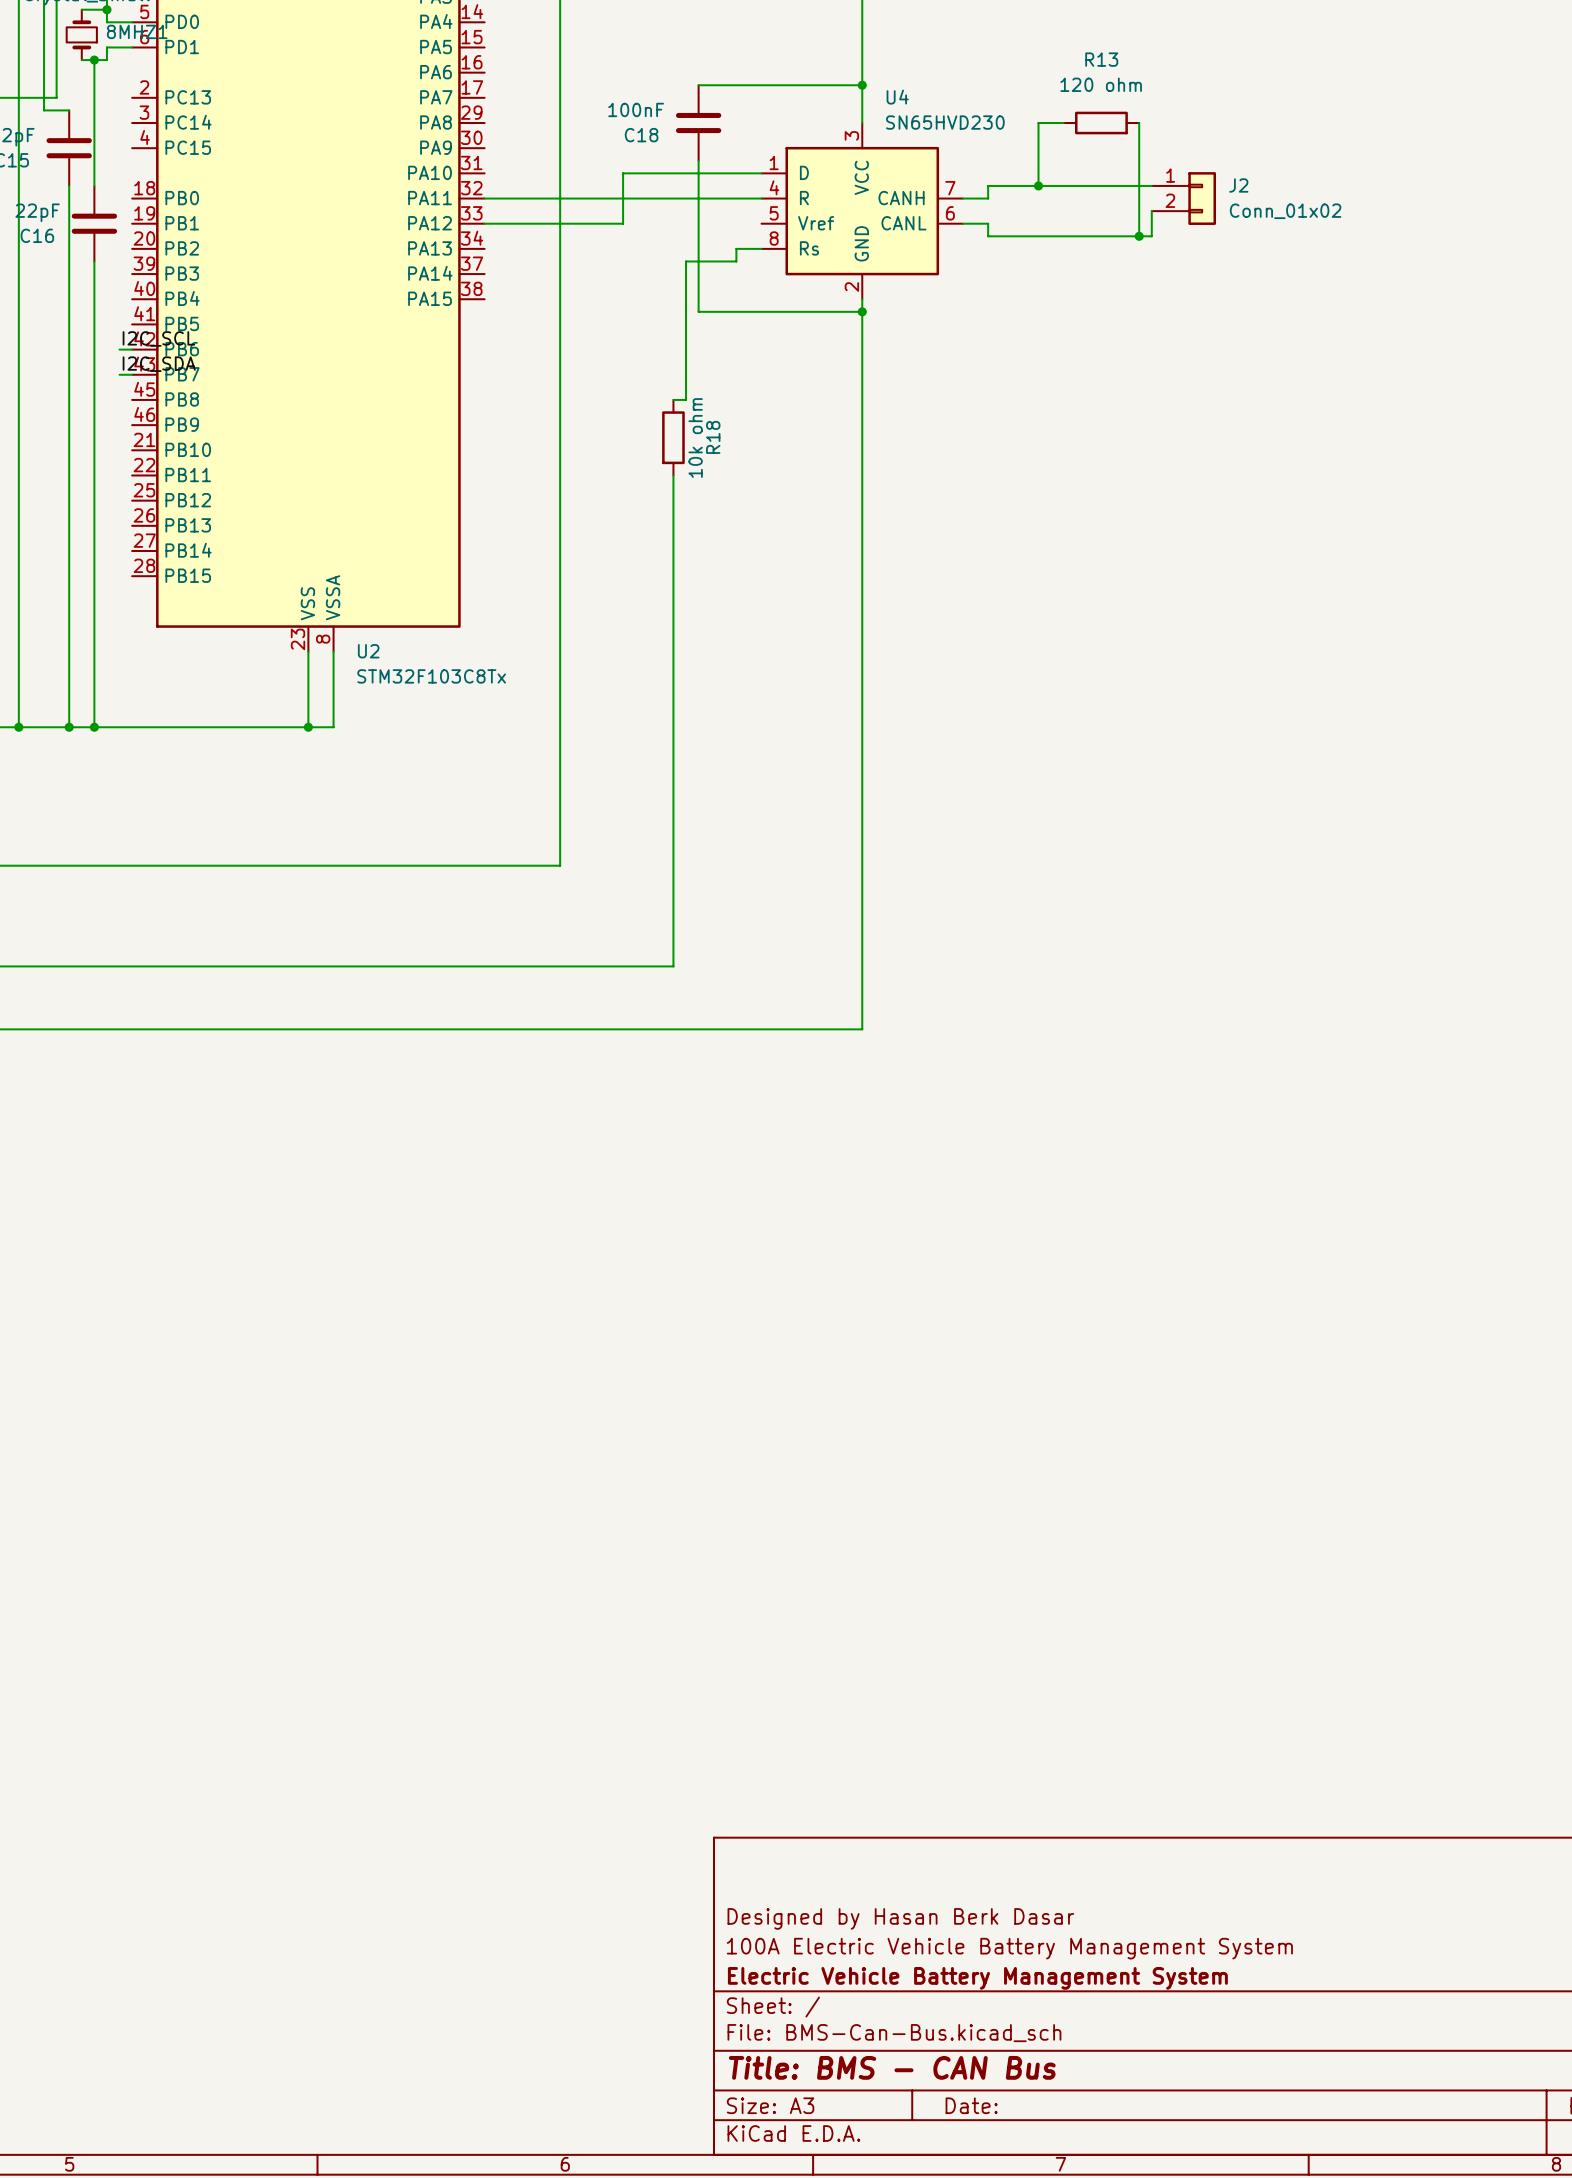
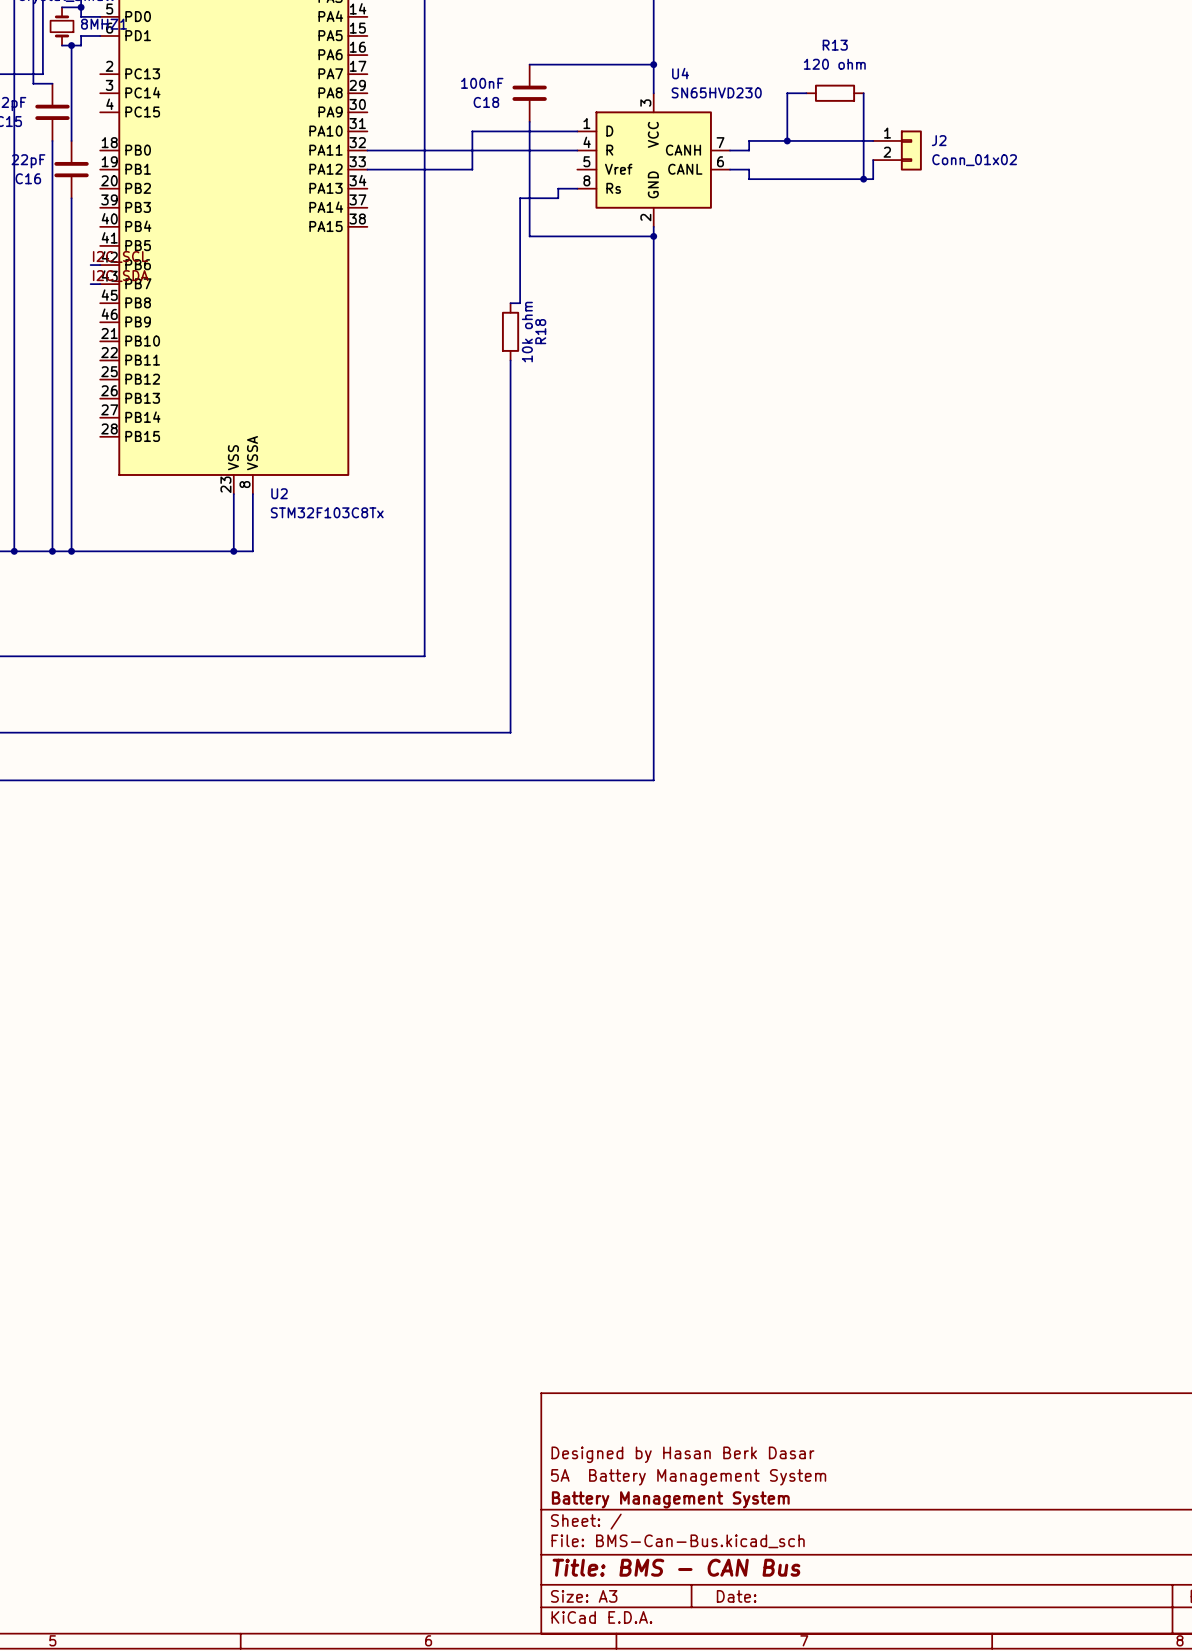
title block: 100A Electric Vehicle Battery Management System (1009, 1948) -> 5A Battery Management System (688, 1477)
title block: Electric Vehicle Battery Management System (977, 1978) -> Battery Management System (670, 1499)

